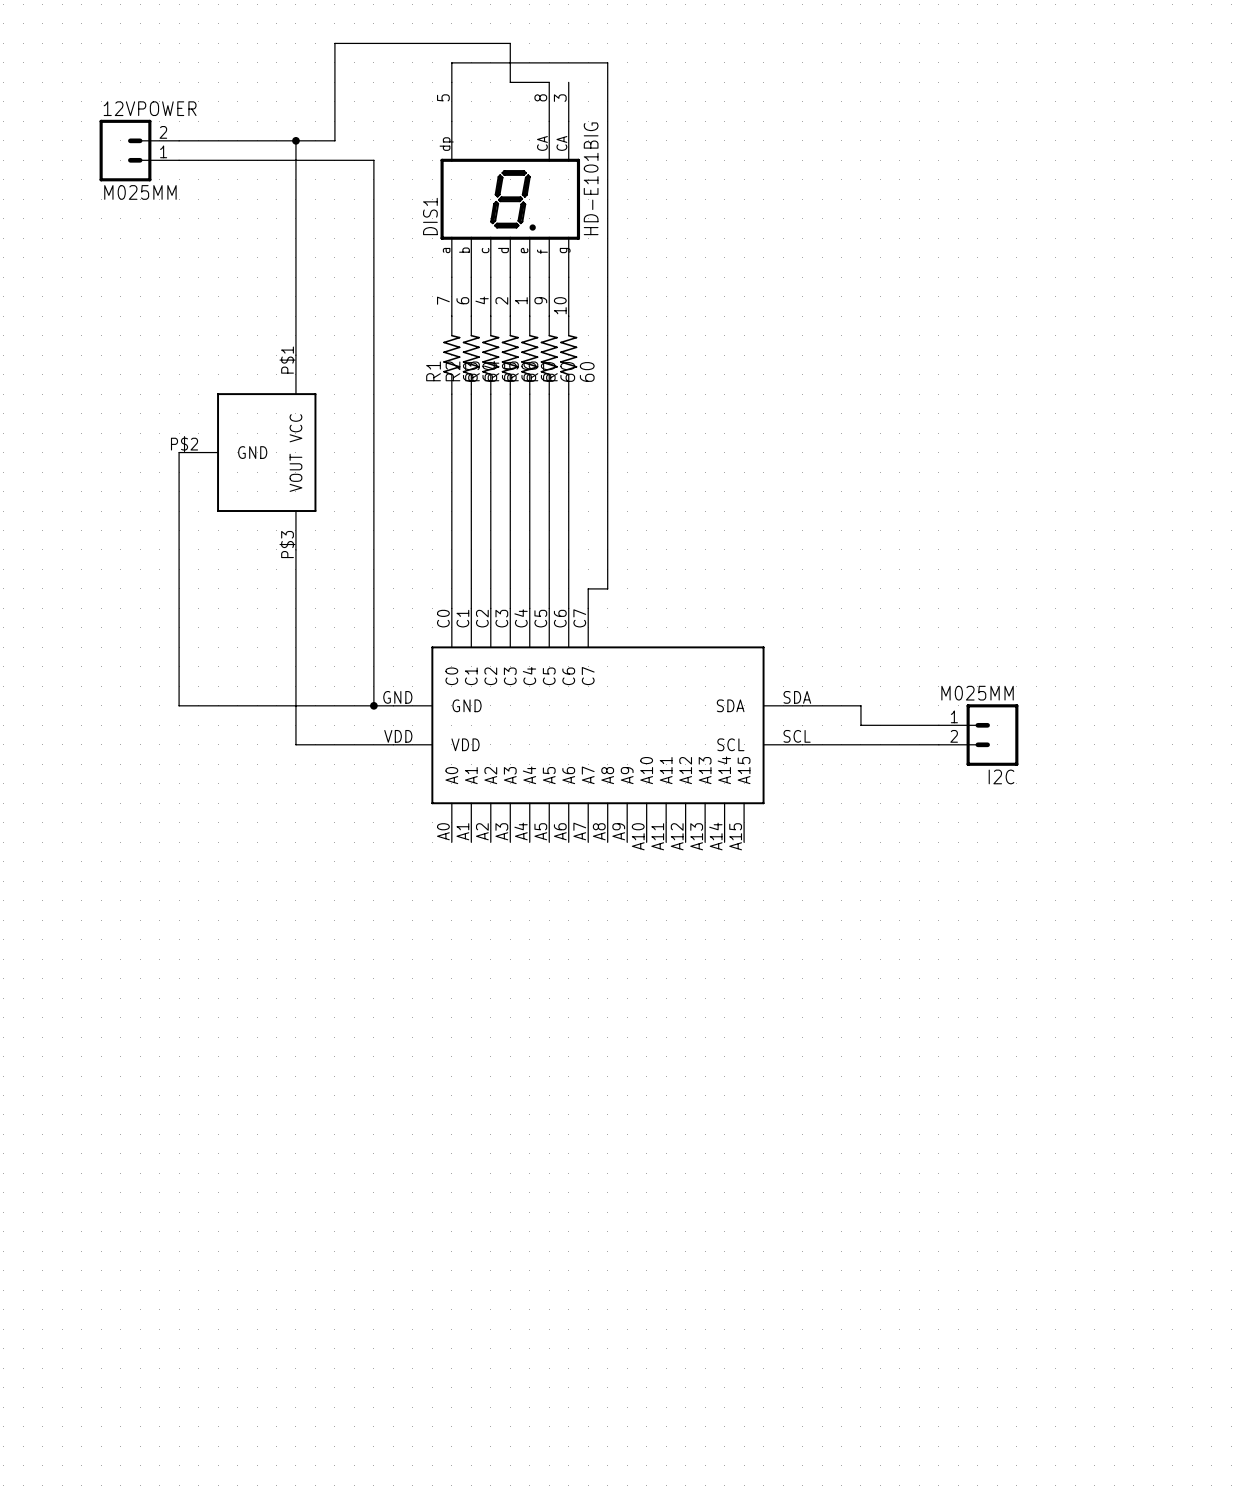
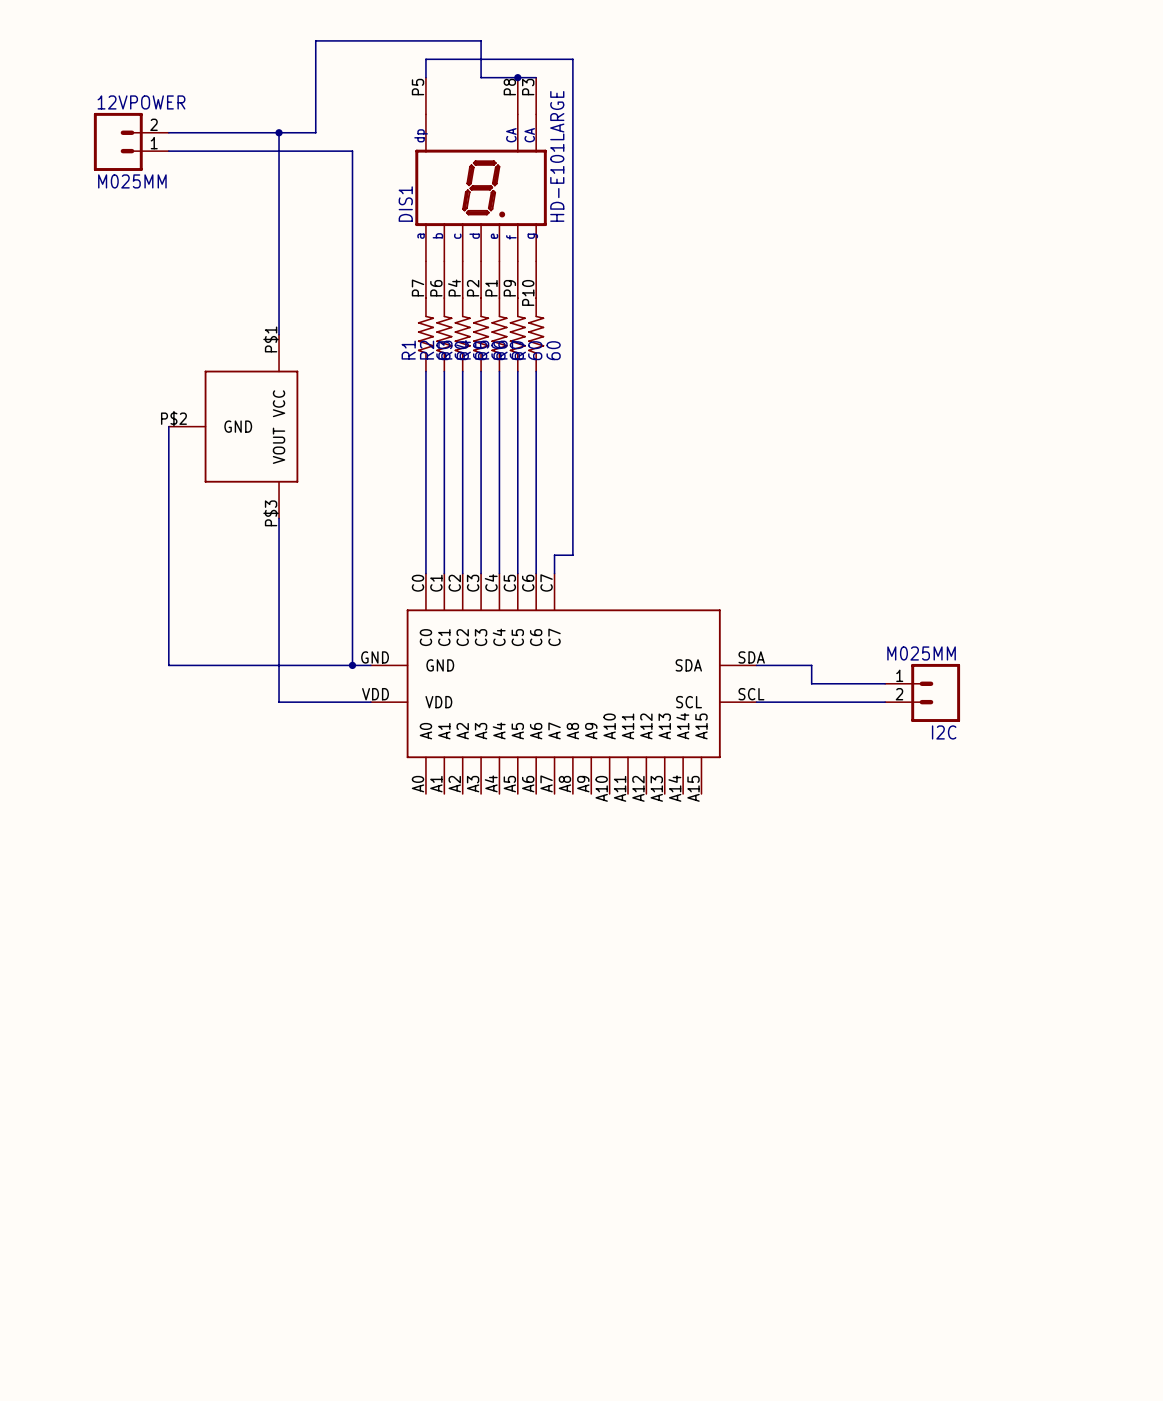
DIS1 symbol: [440, 82, 581, 317] -> [415, 77, 547, 299]
wire: none -> (517, 77) (536, 77)
junction: none -> (517, 77)
DIS1 value: HD-E101BIG (591, 178) -> HD-E101LARGE (557, 156)

